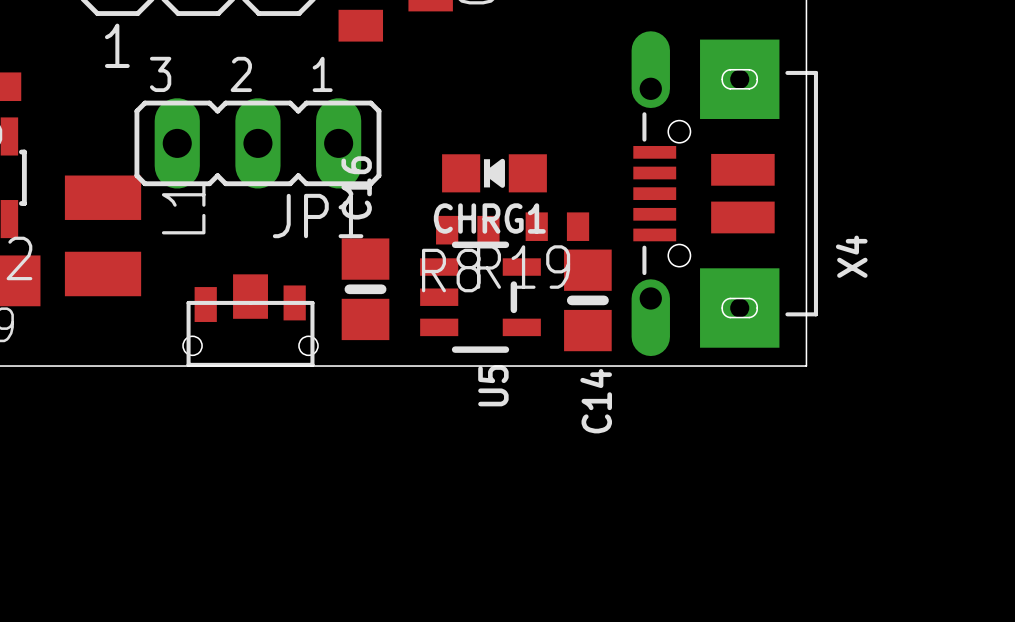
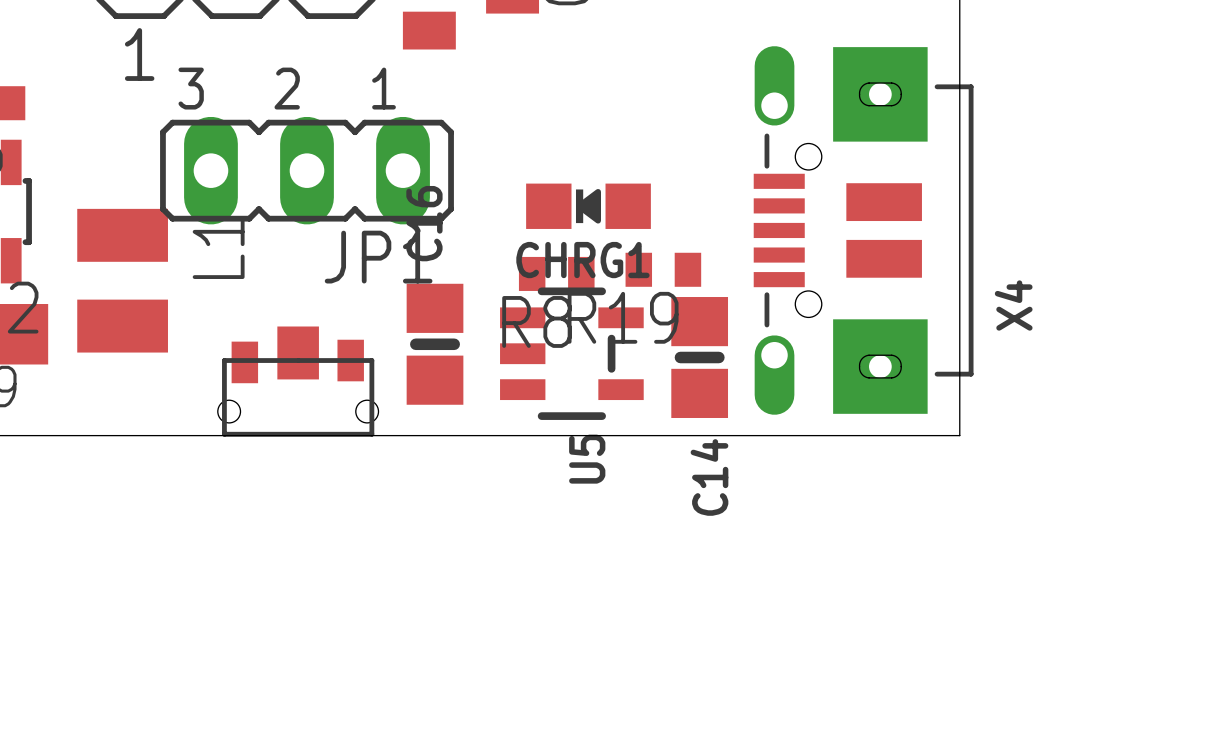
X4 footprint: [631, 31, 818, 357] -> [753, 46, 974, 415]

